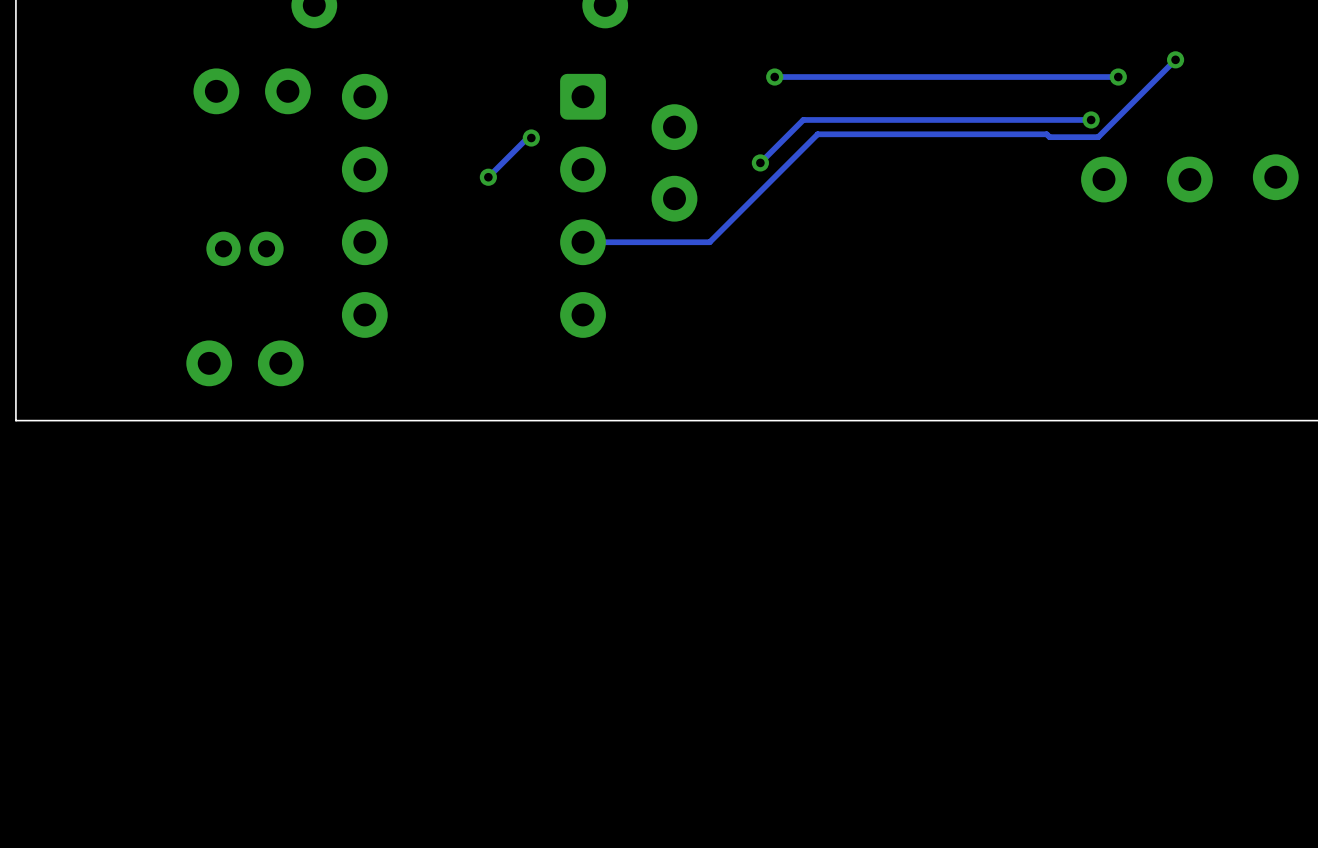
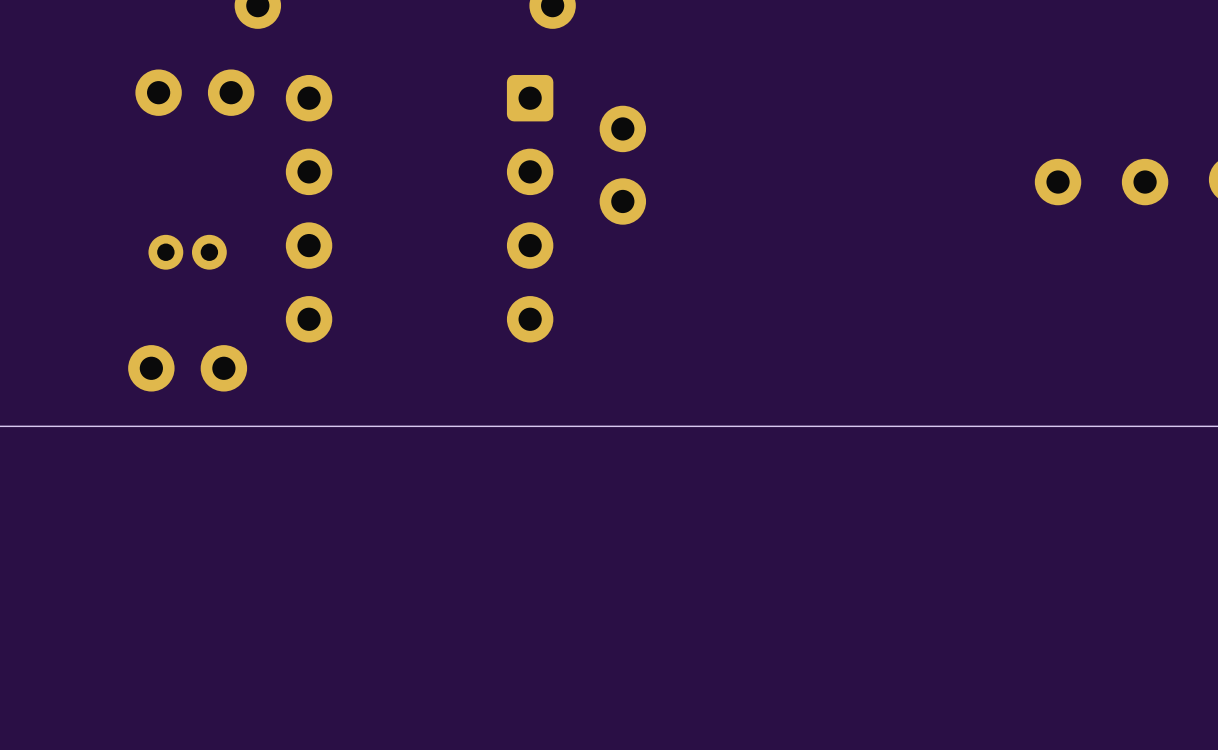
track: (1175, 59) (1098, 137) (1049, 137) (1046, 134) (817, 134) (709, 242) (583, 242) -> none
via: (1175, 59) -> none
via: (774, 77) -> none
track: (1118, 77) (774, 77) -> none
via: (1118, 77) -> none
track: (1091, 119) (803, 119) (760, 162) -> none
via: (1091, 119) -> none
track: (531, 138) (527, 138) (488, 177) -> none
via: (531, 138) -> none
via: (760, 162) -> none
via: (488, 177) -> none

